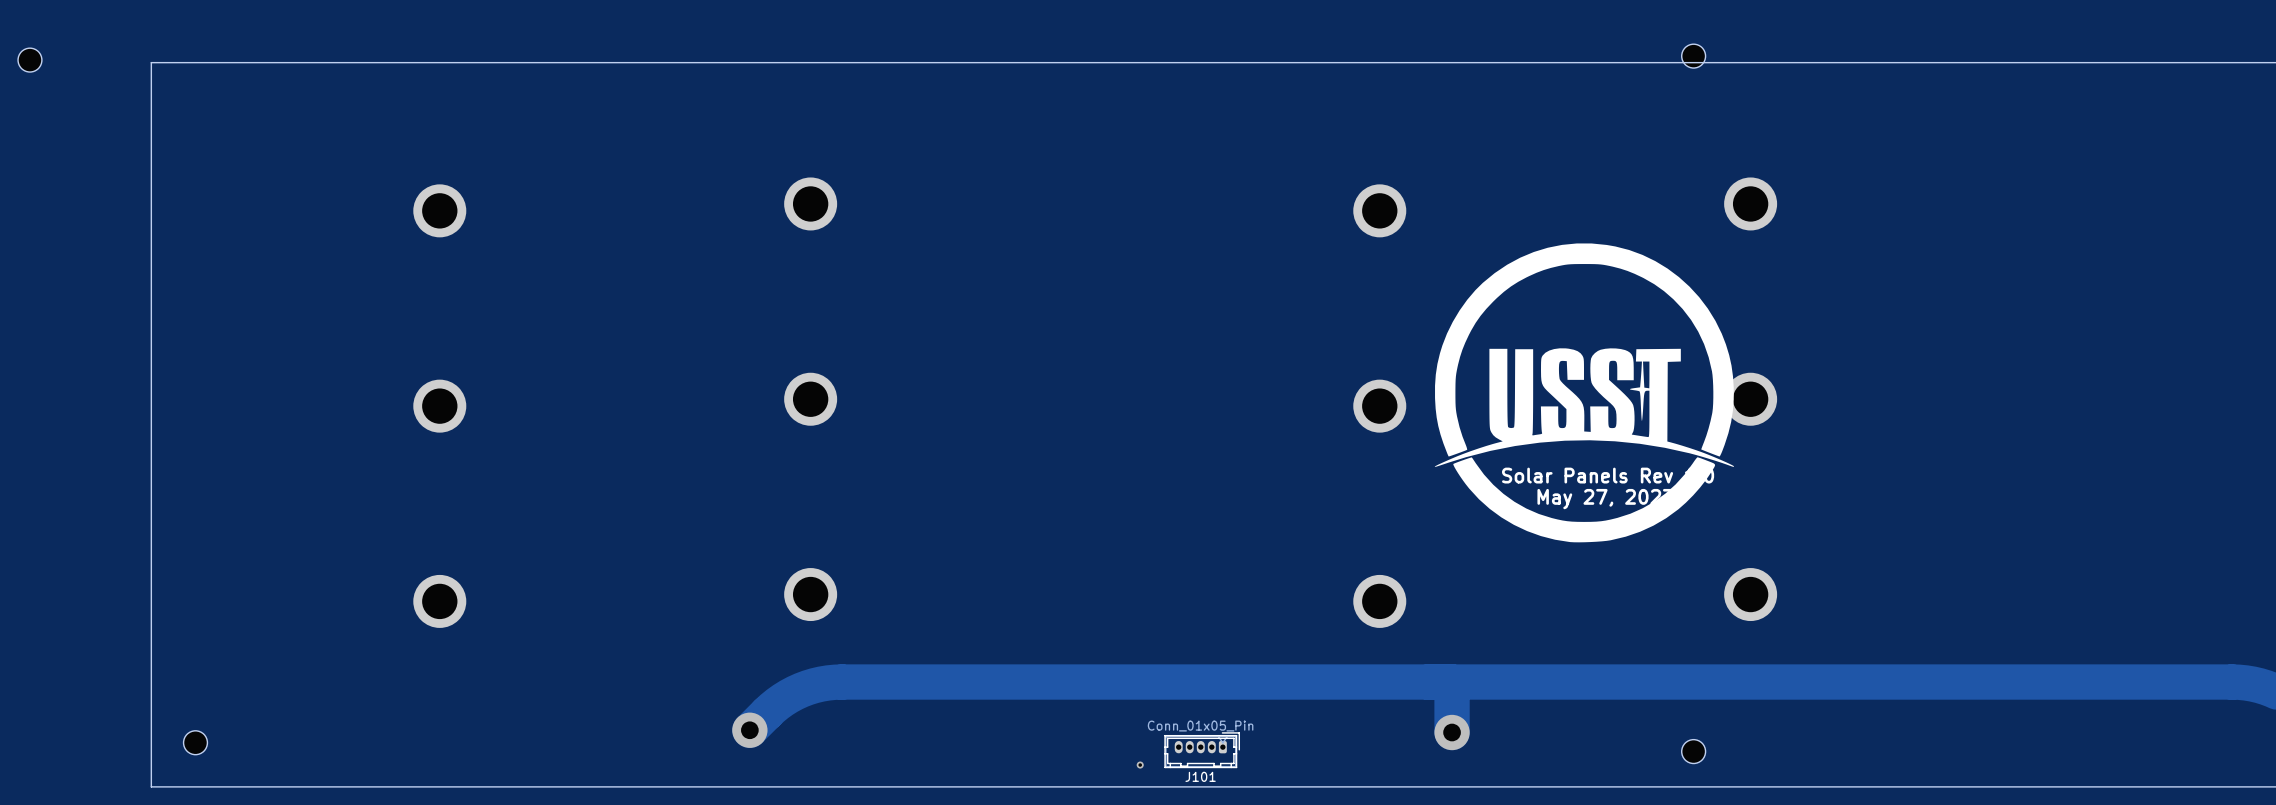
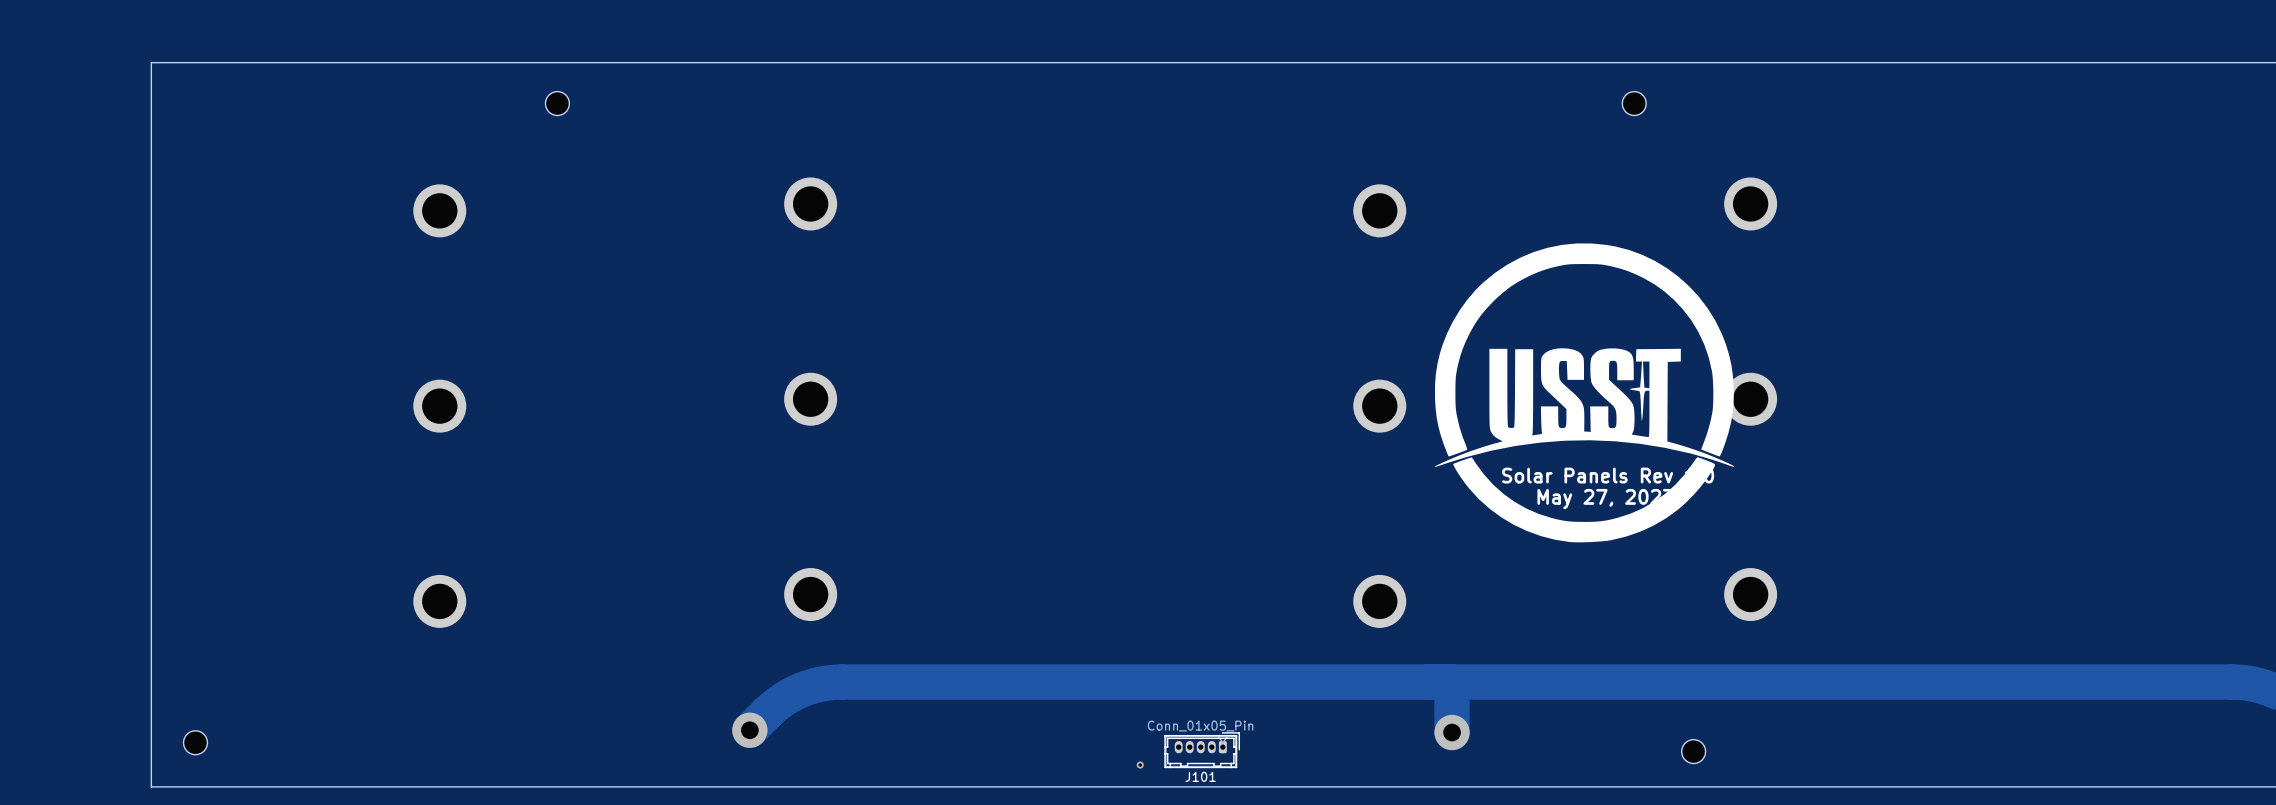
part position: (1693, 56) -> (1634, 103)
part: (29, 60) -> none
part: none -> (557, 103)

